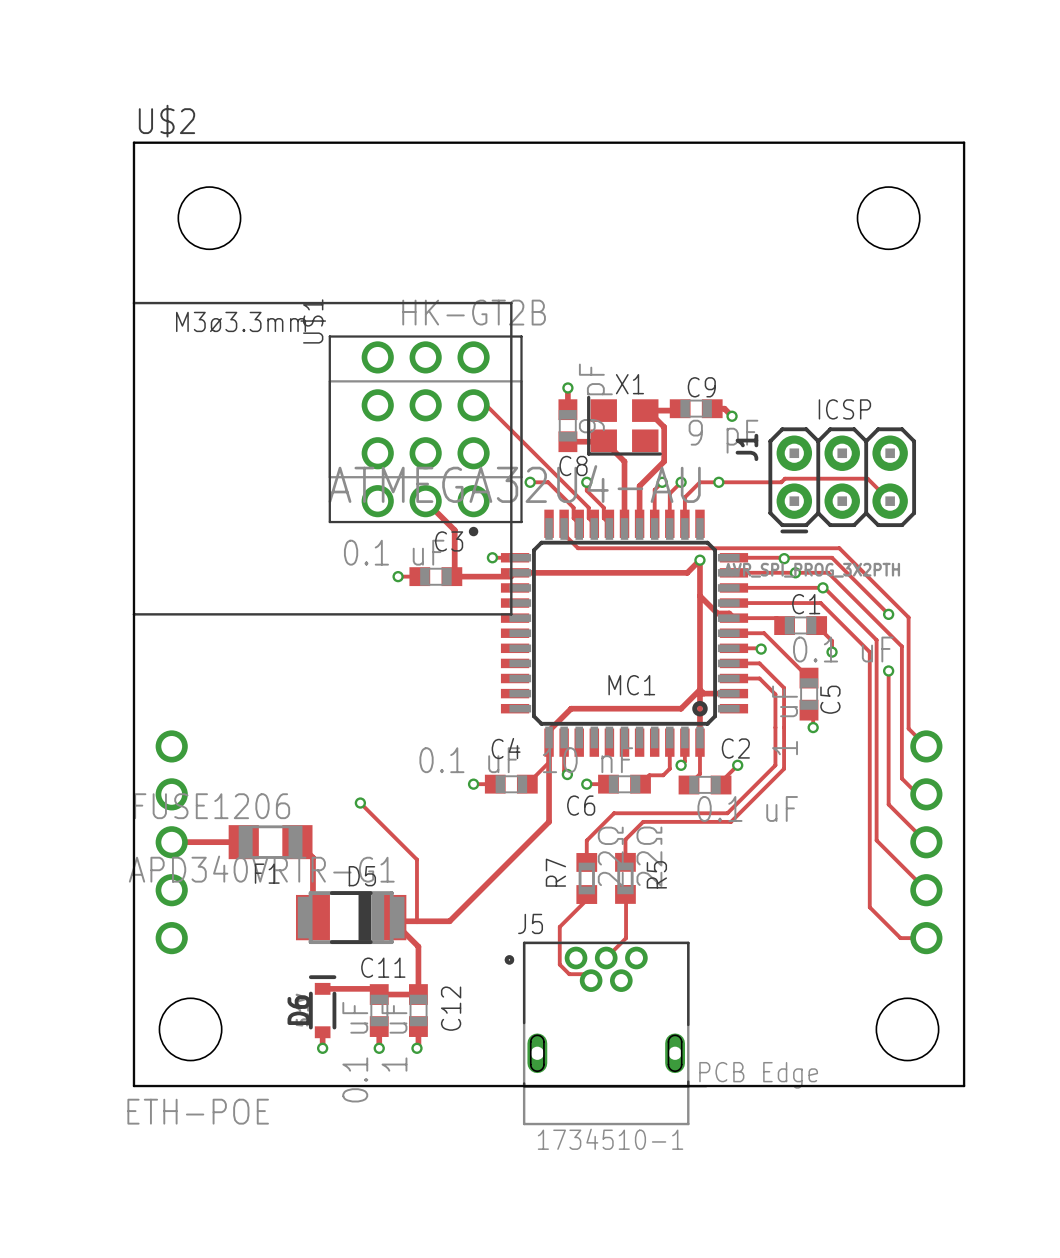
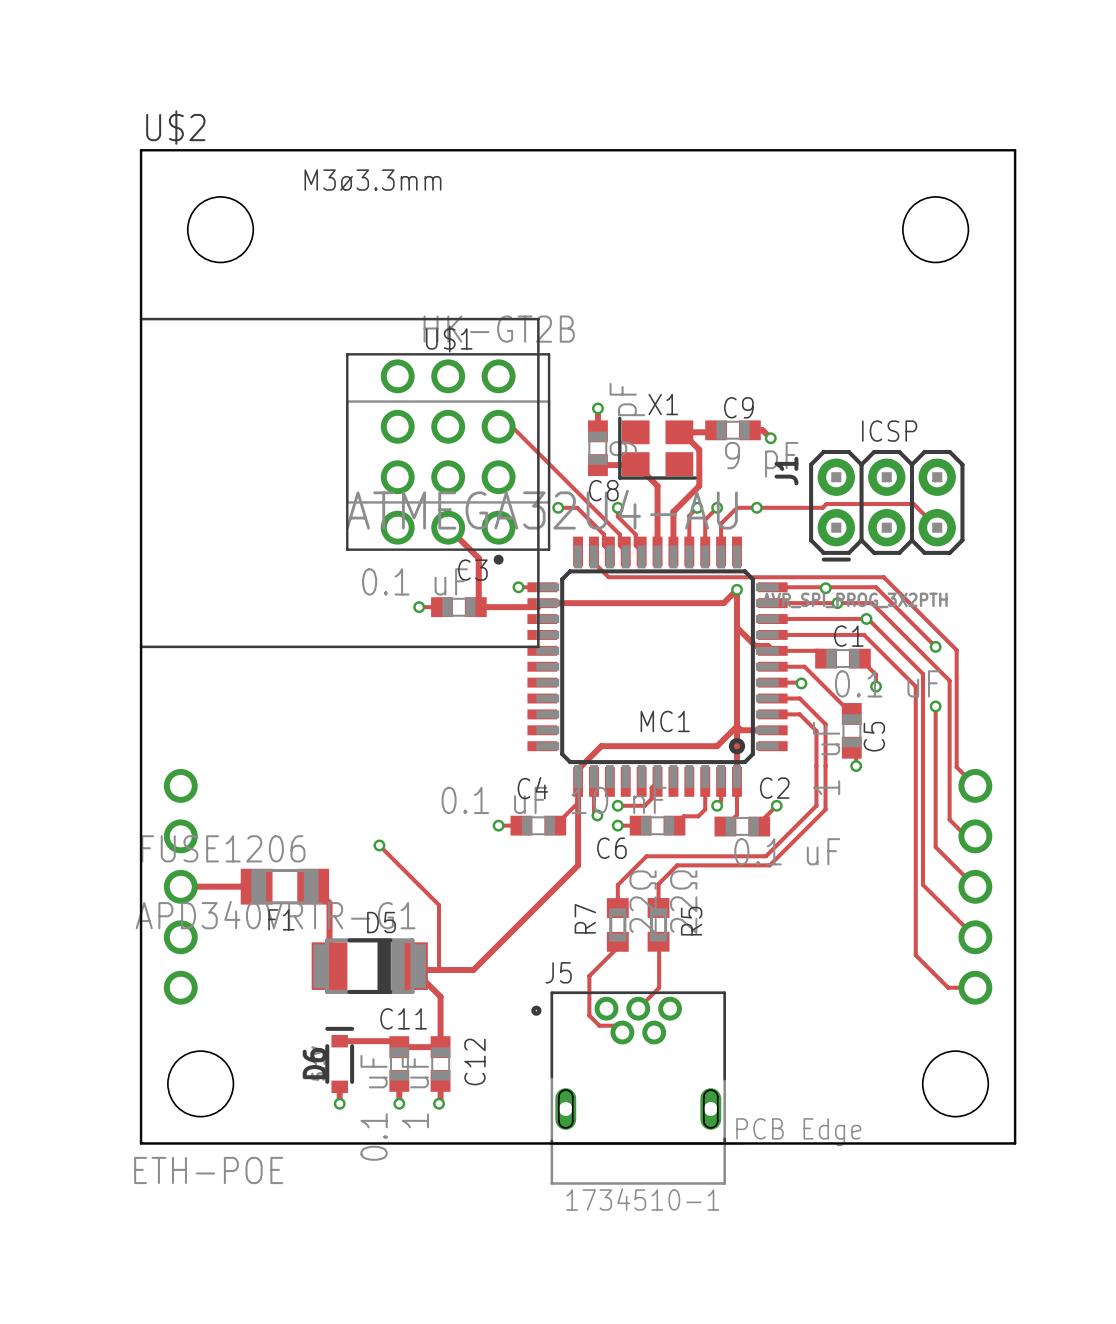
text position: M3ø3.3mm (241, 321) -> M3ø3.3mm (372, 180)
U$1 name rotation: 0° (313, 321) -> 90° clockwise (449, 338)
U$1 name position: U$1 (313, 321) -> U$1 (449, 338)
track: none -> (657, 781) (651, 787) (651, 798) (644, 805) (617, 805)
via: none -> (617, 805)

